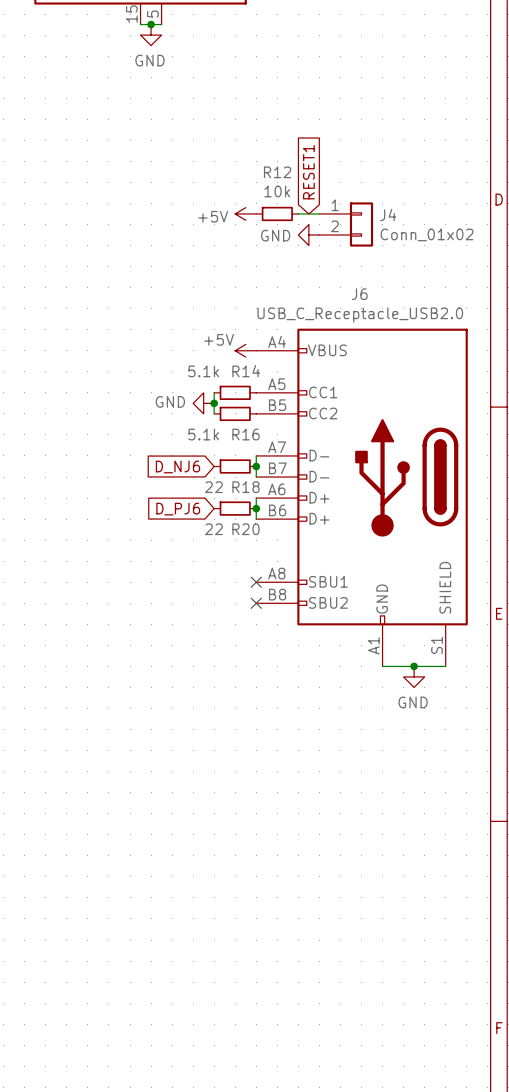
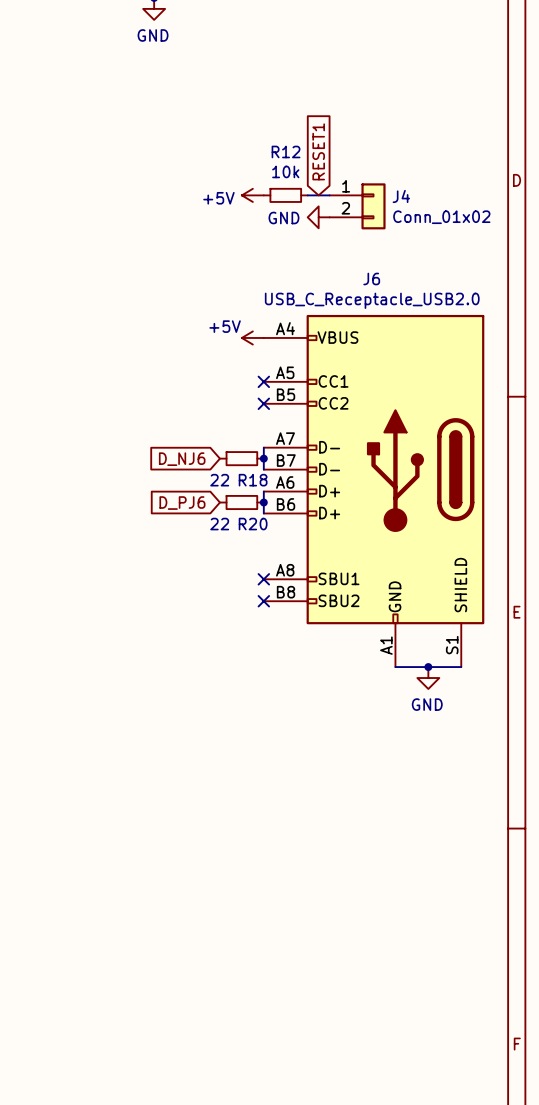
wire: (214, 392) (214, 413) -> none
R14: 5.1k (235, 392) -> none
no-connect mark: none -> (263, 381)
power symbol: GND (203, 403) -> none
junction: (214, 403) -> none
R16: 5.1k (235, 413) -> none
no-connect mark: none -> (263, 403)

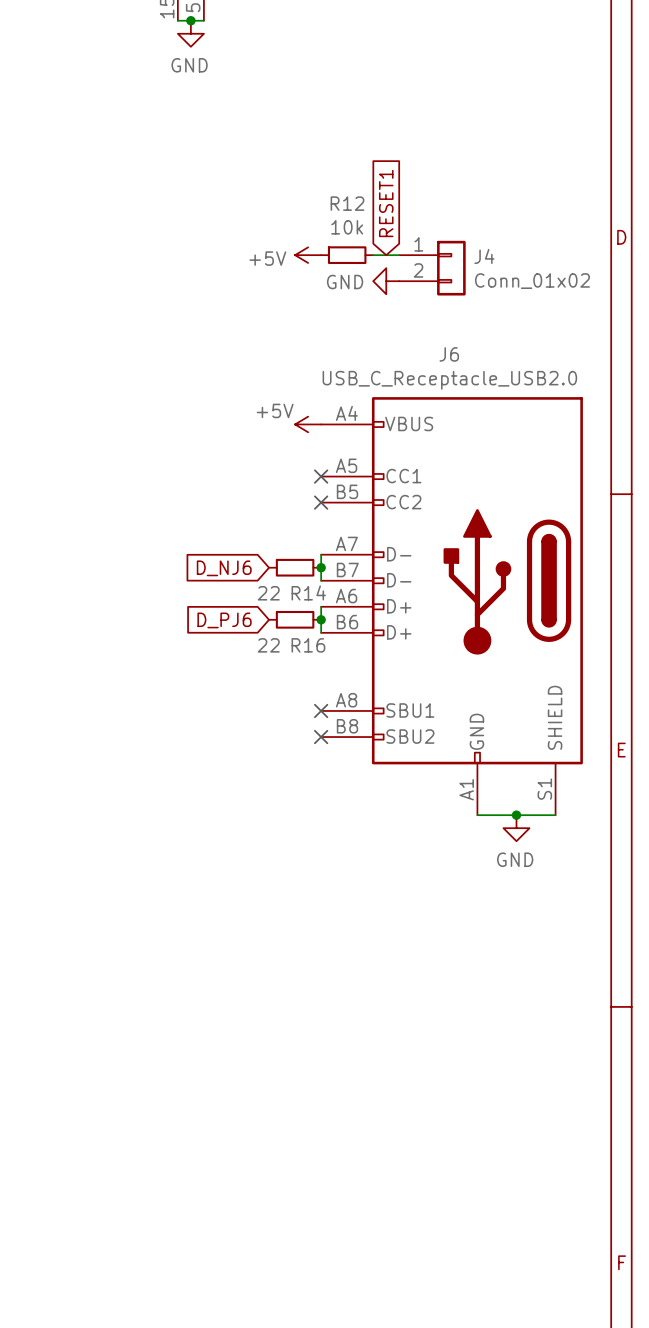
R18 name: R18 (253, 480) -> R14 (308, 592)
R20 name: R20 (253, 524) -> R16 (308, 645)

